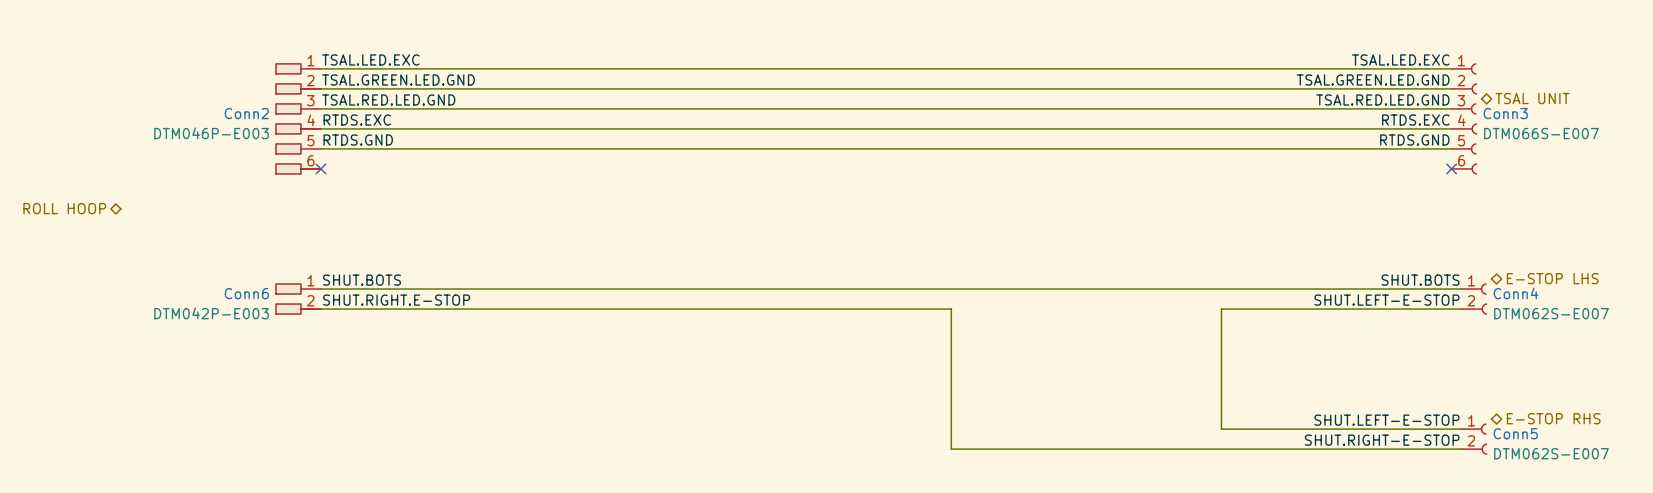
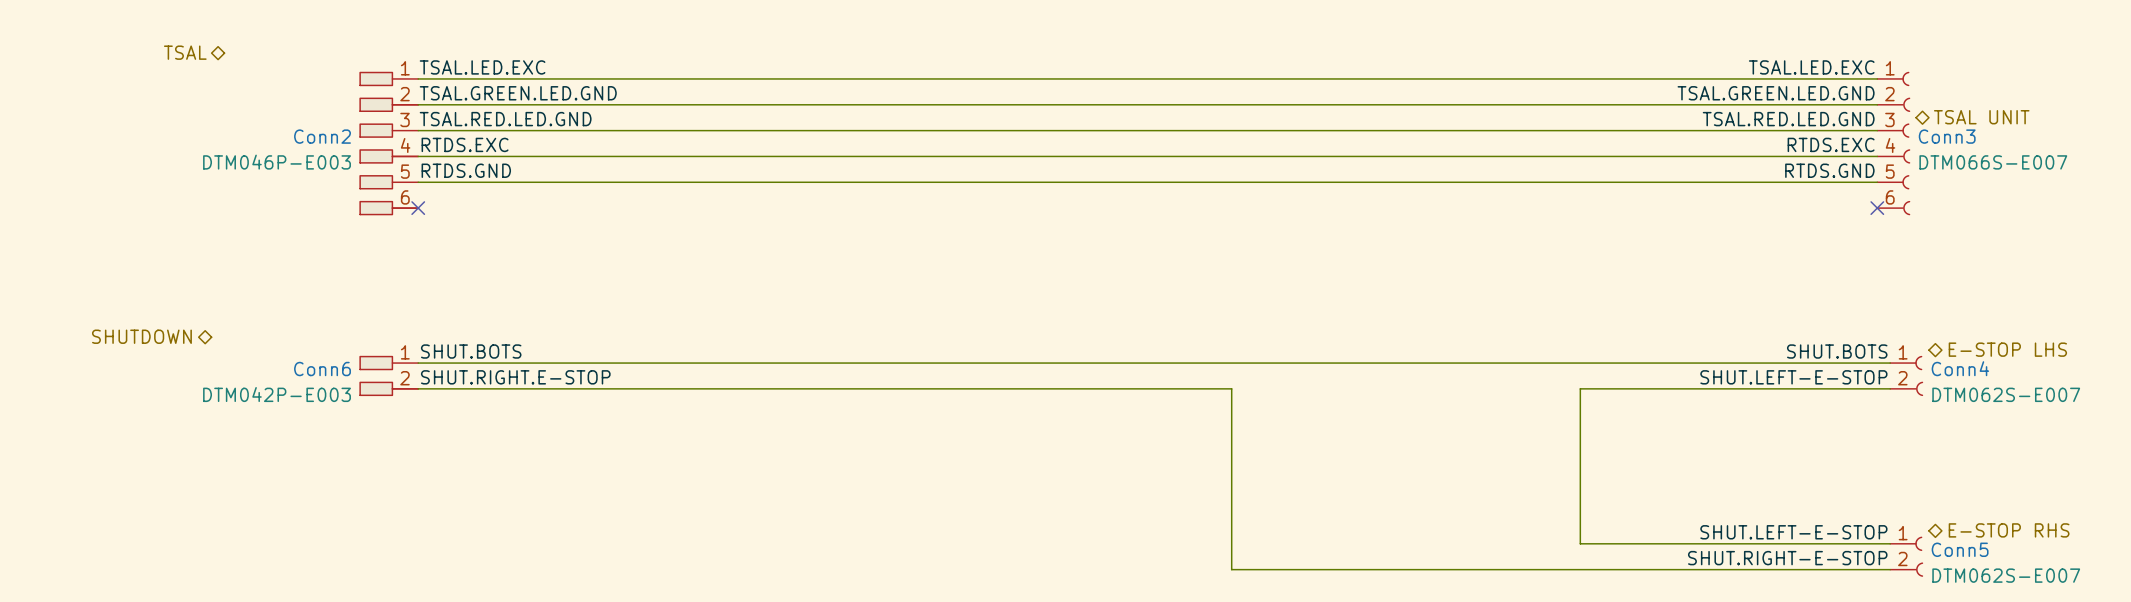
hierarchical label: none -> TSAL (185, 52)
hierarchical label: ROLL HOOP (64, 208) -> none
hierarchical label: none -> SHUTDOWN (141, 336)

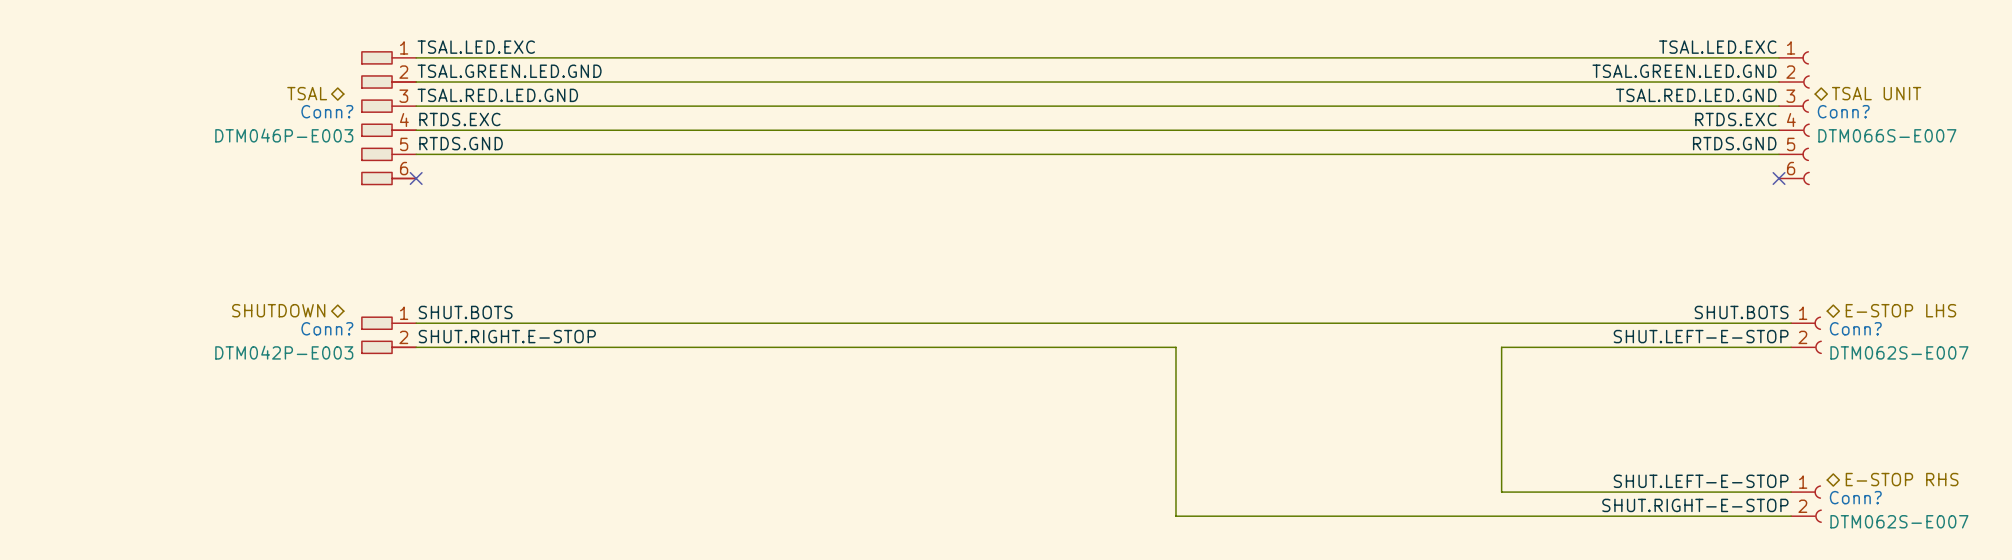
hierarchical label position: TSAL (185, 52) -> TSAL (307, 93)
Conn2 name: Conn2 (322, 136) -> Conn? (327, 111)
Conn3 name: Conn3 (1947, 136) -> Conn? (1843, 111)
hierarchical label position: SHUTDOWN (141, 336) -> SHUTDOWN (278, 310)
Conn4 name: Conn4 (1960, 368) -> Conn? (1855, 328)
Conn6 name: Conn6 (322, 369) -> Conn? (327, 328)
Conn5 name: Conn5 (1960, 549) -> Conn? (1855, 497)

